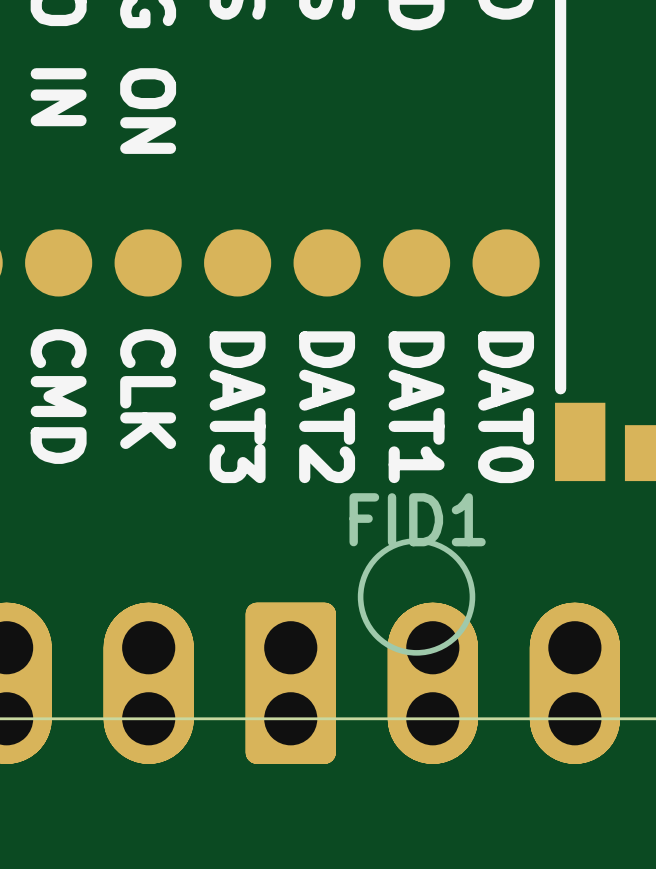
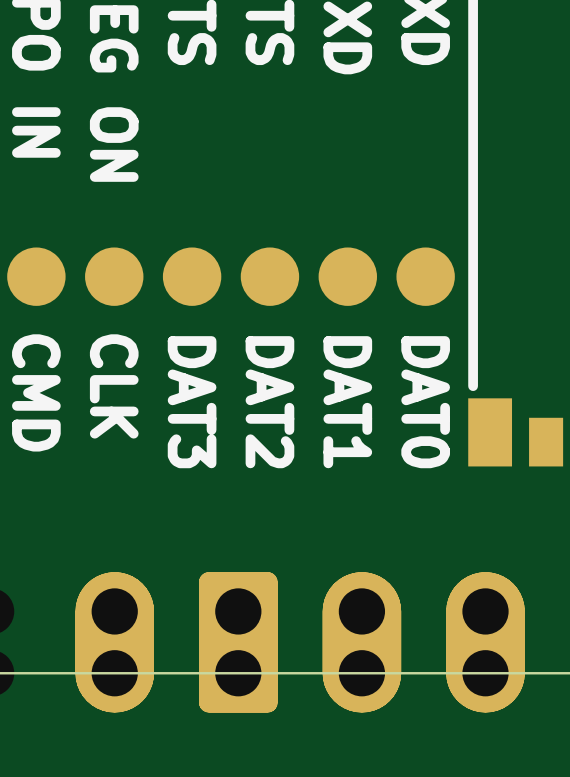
text: FID1 (417, 519) -> none
drawing: [357, 538, 476, 656] -> none

